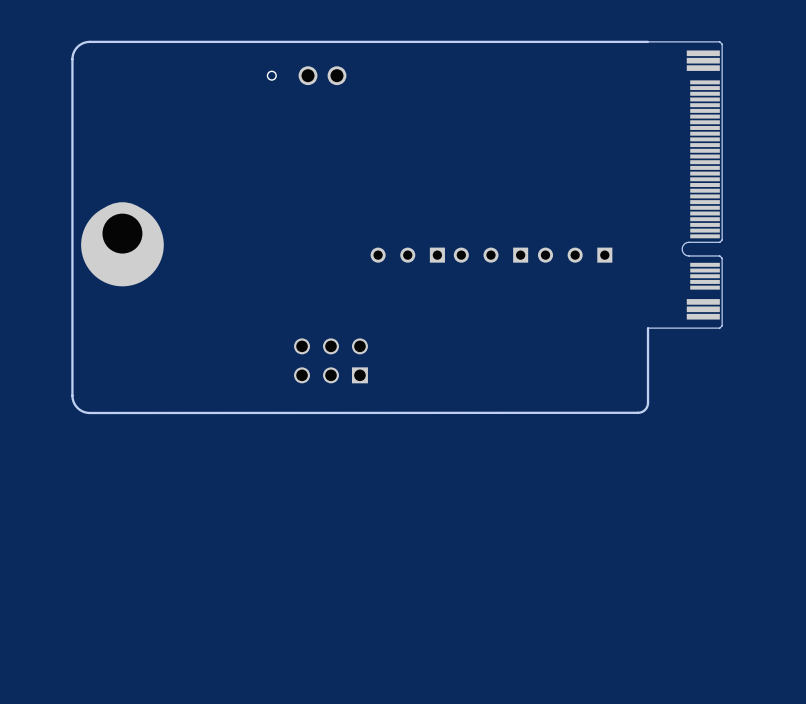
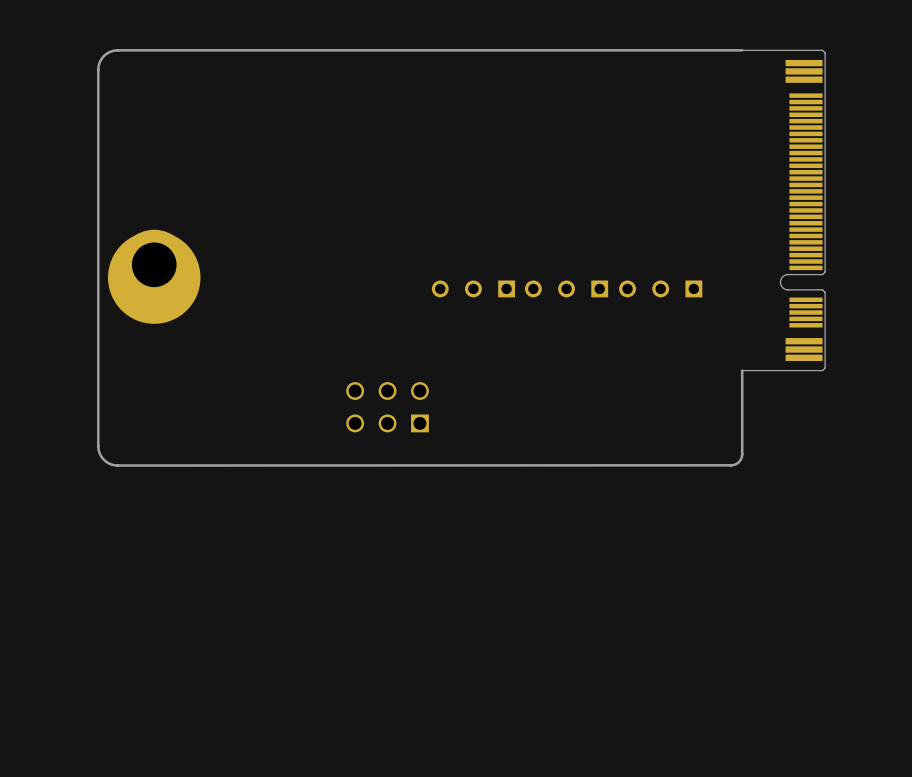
part: (306, 75) -> none

